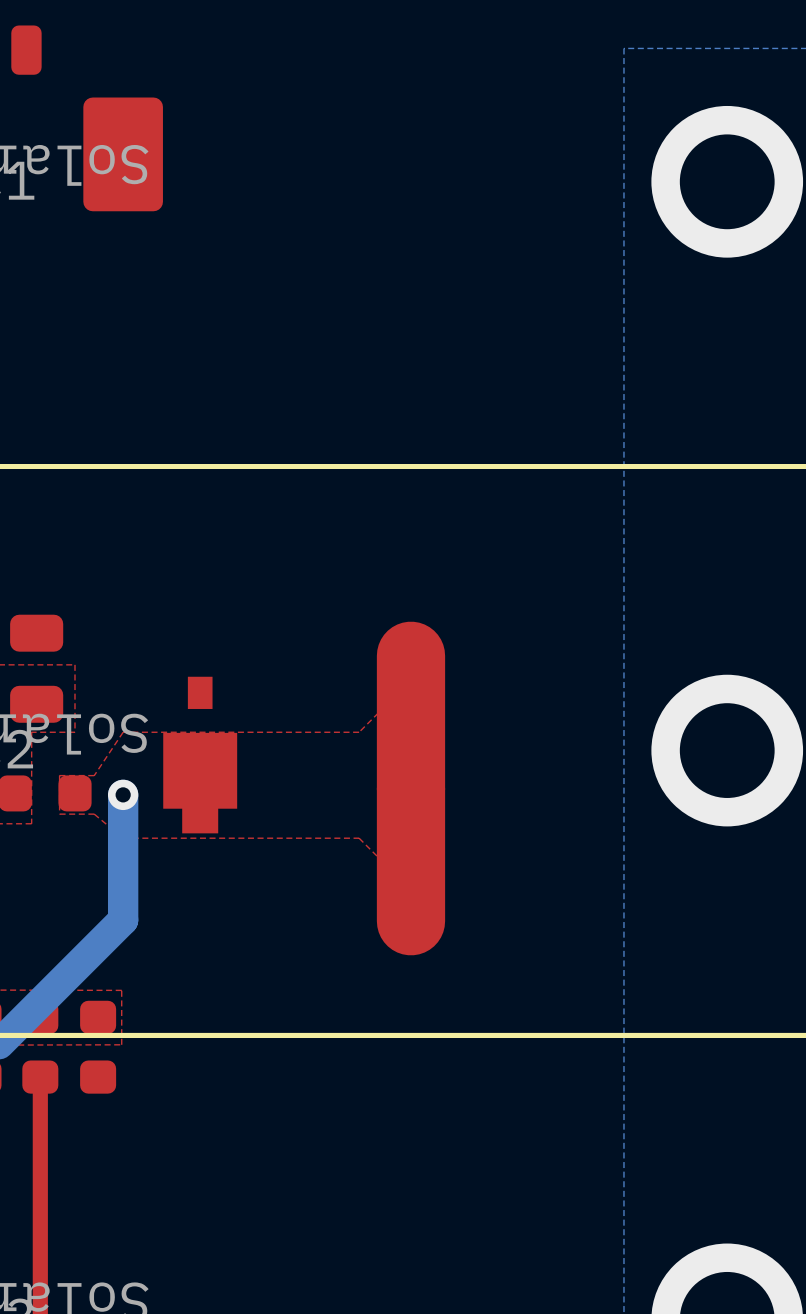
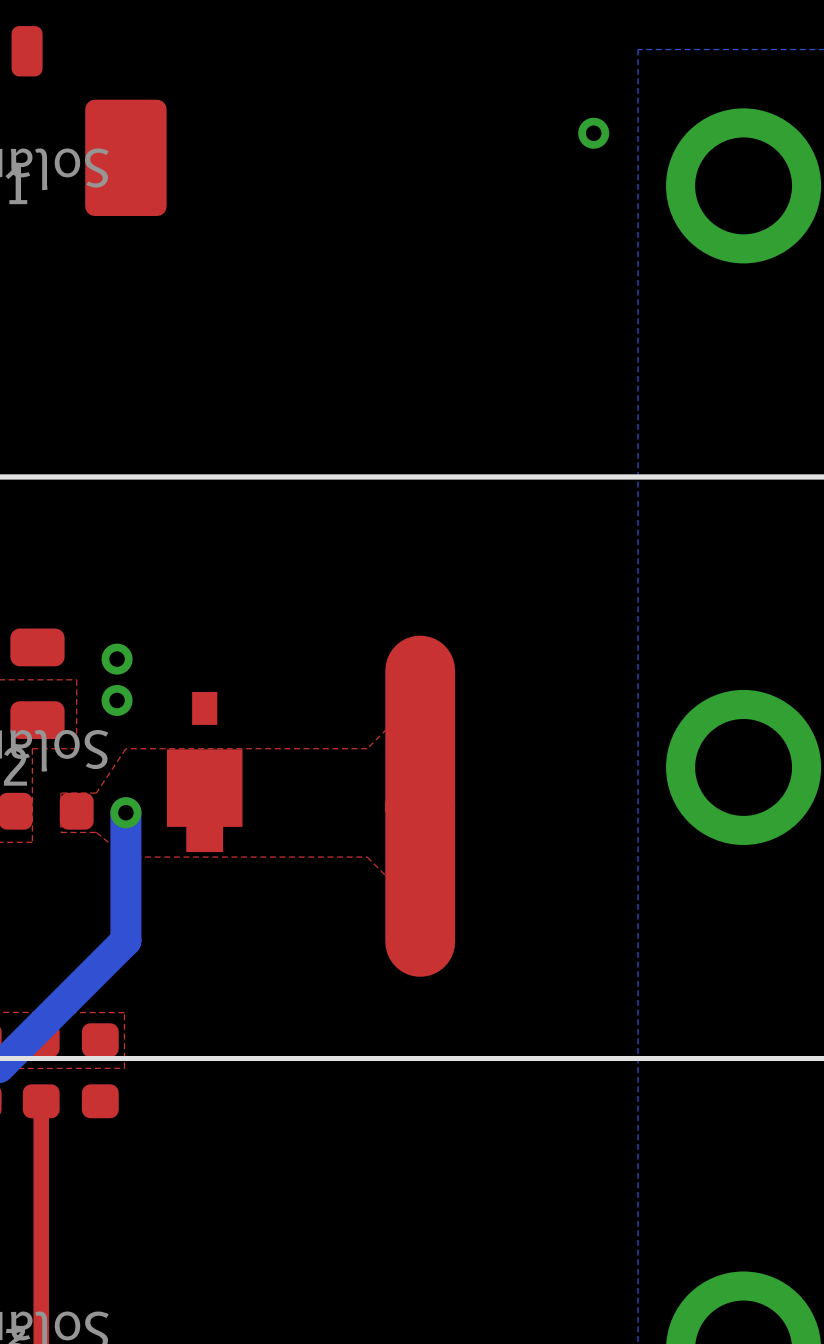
via: none -> (593, 133)
via: none -> (117, 659)
via: none -> (117, 700)

